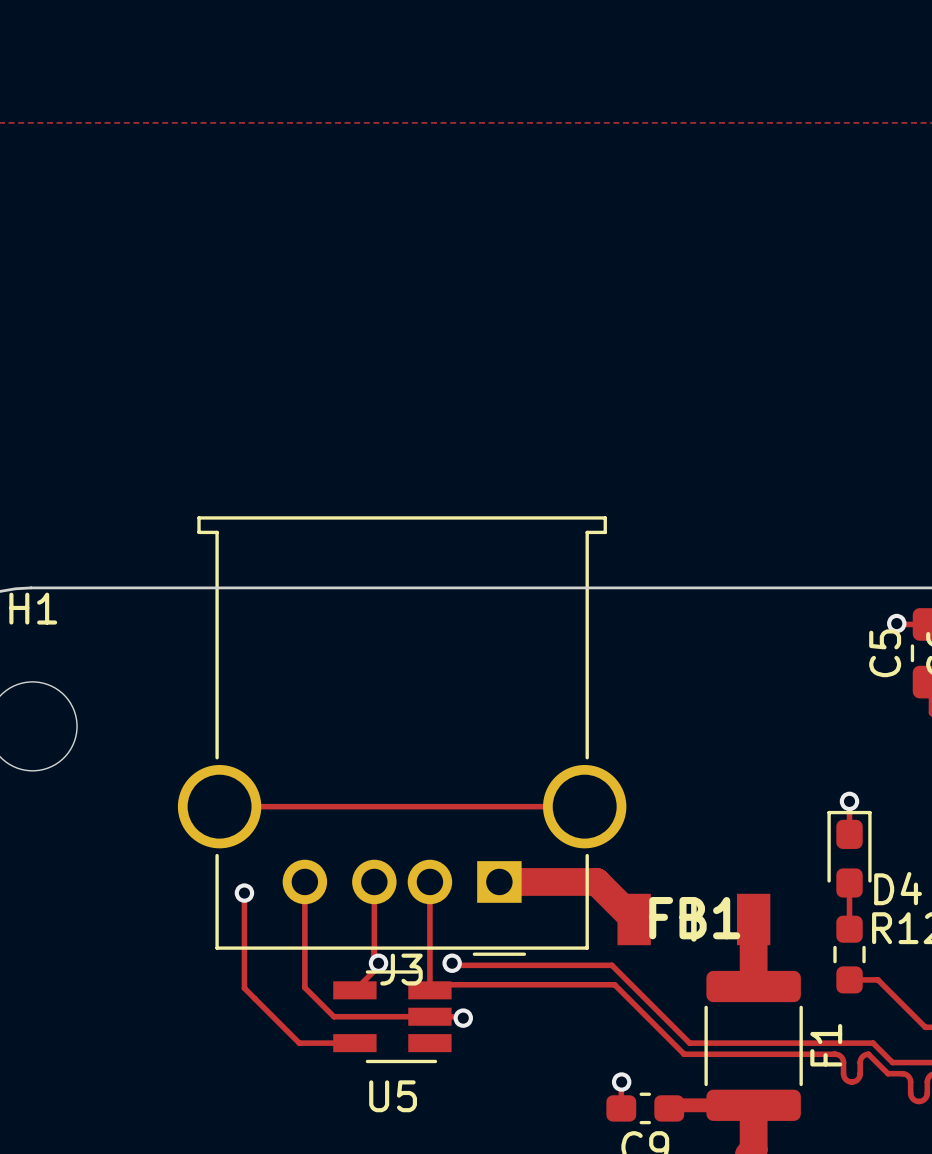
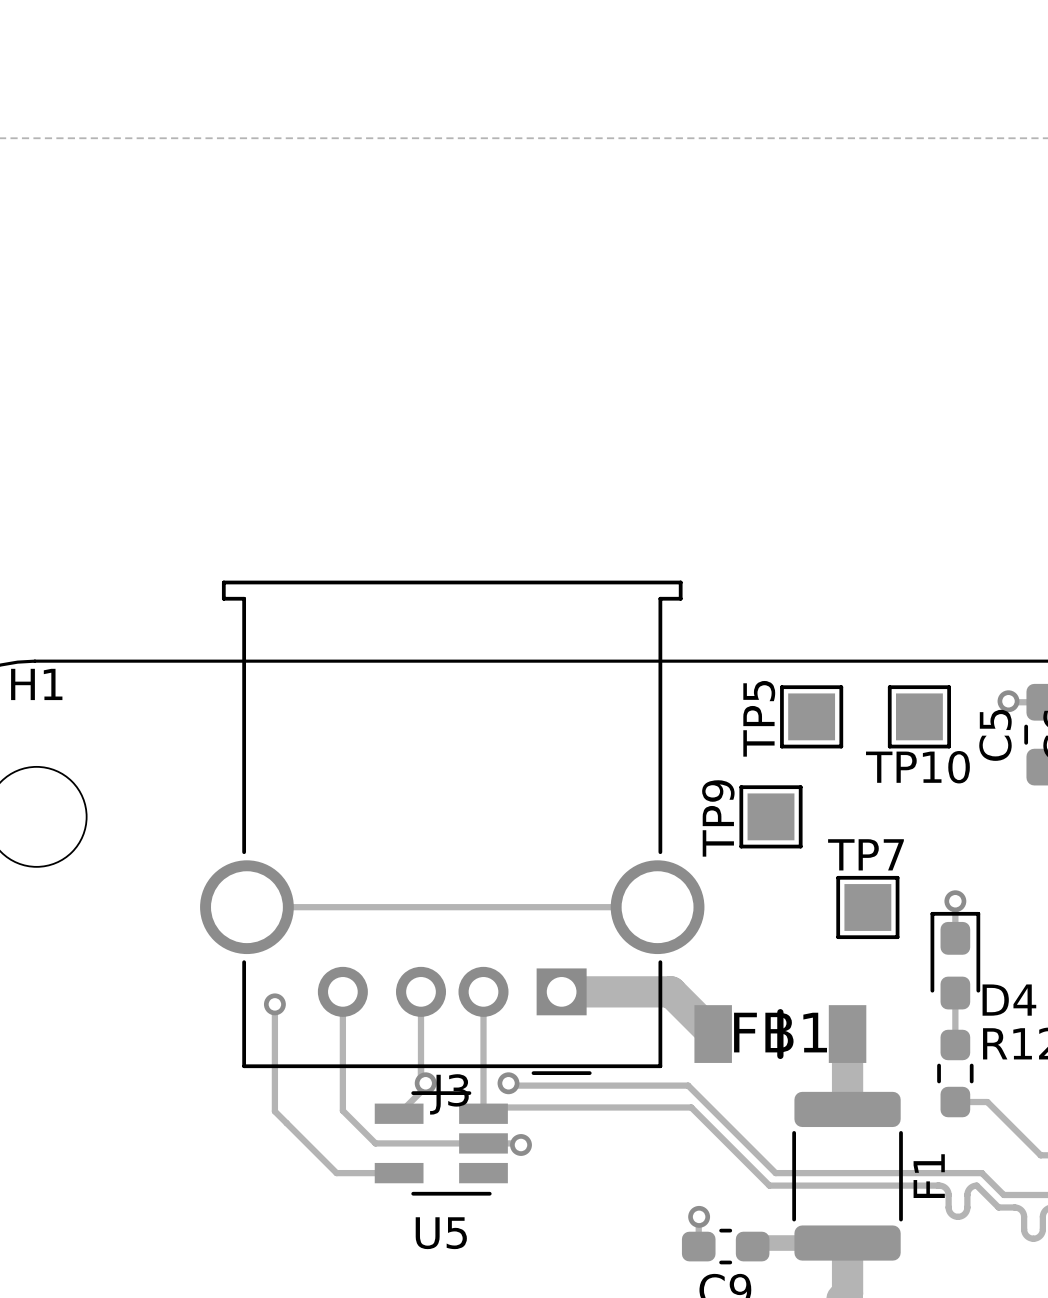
TP5: none -> (811, 716)
TP10: none -> (919, 716)
TP9: none -> (771, 816)
TP7: none -> (867, 907)

